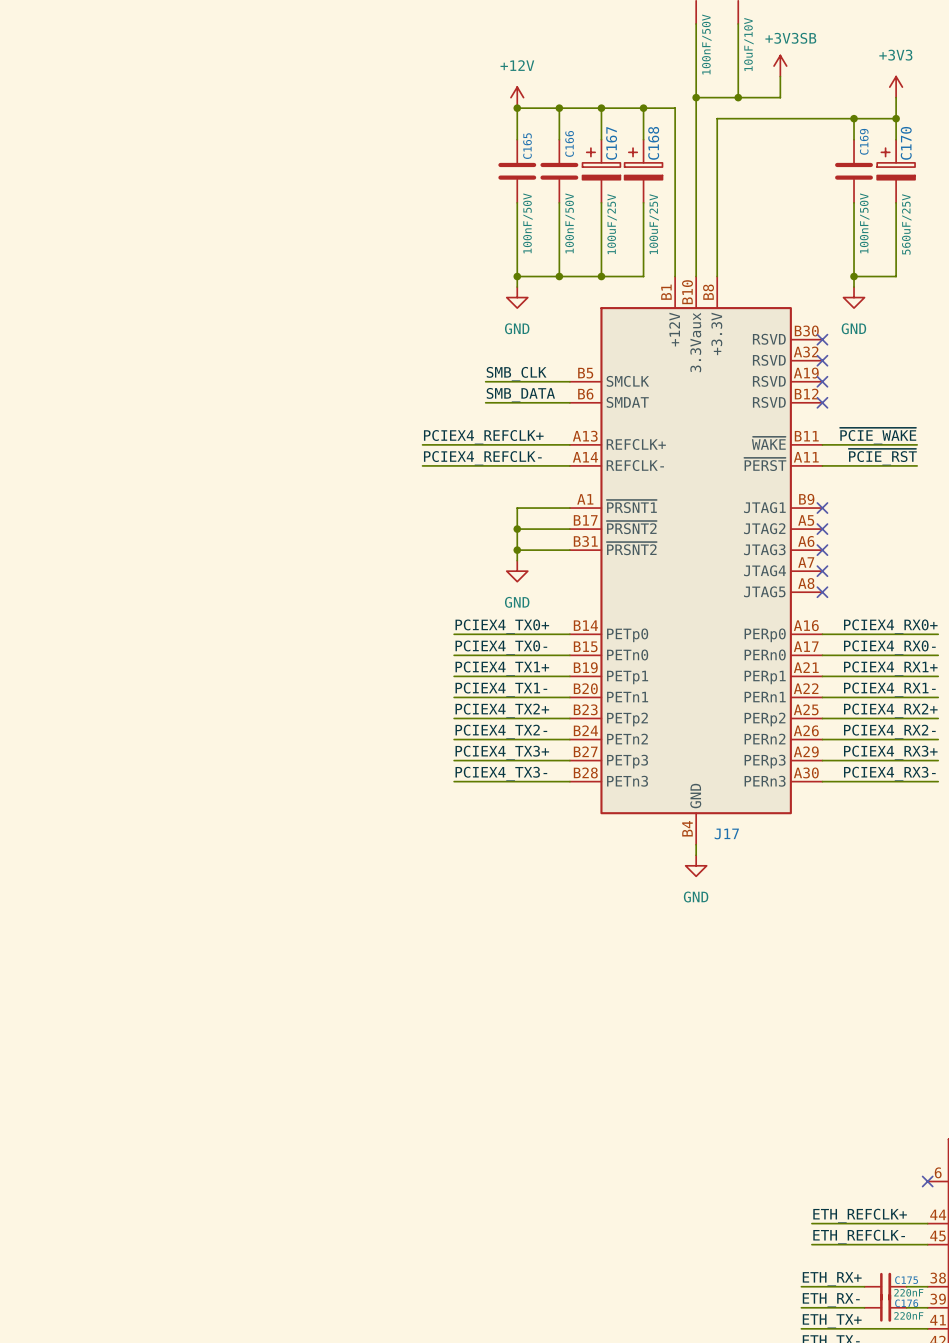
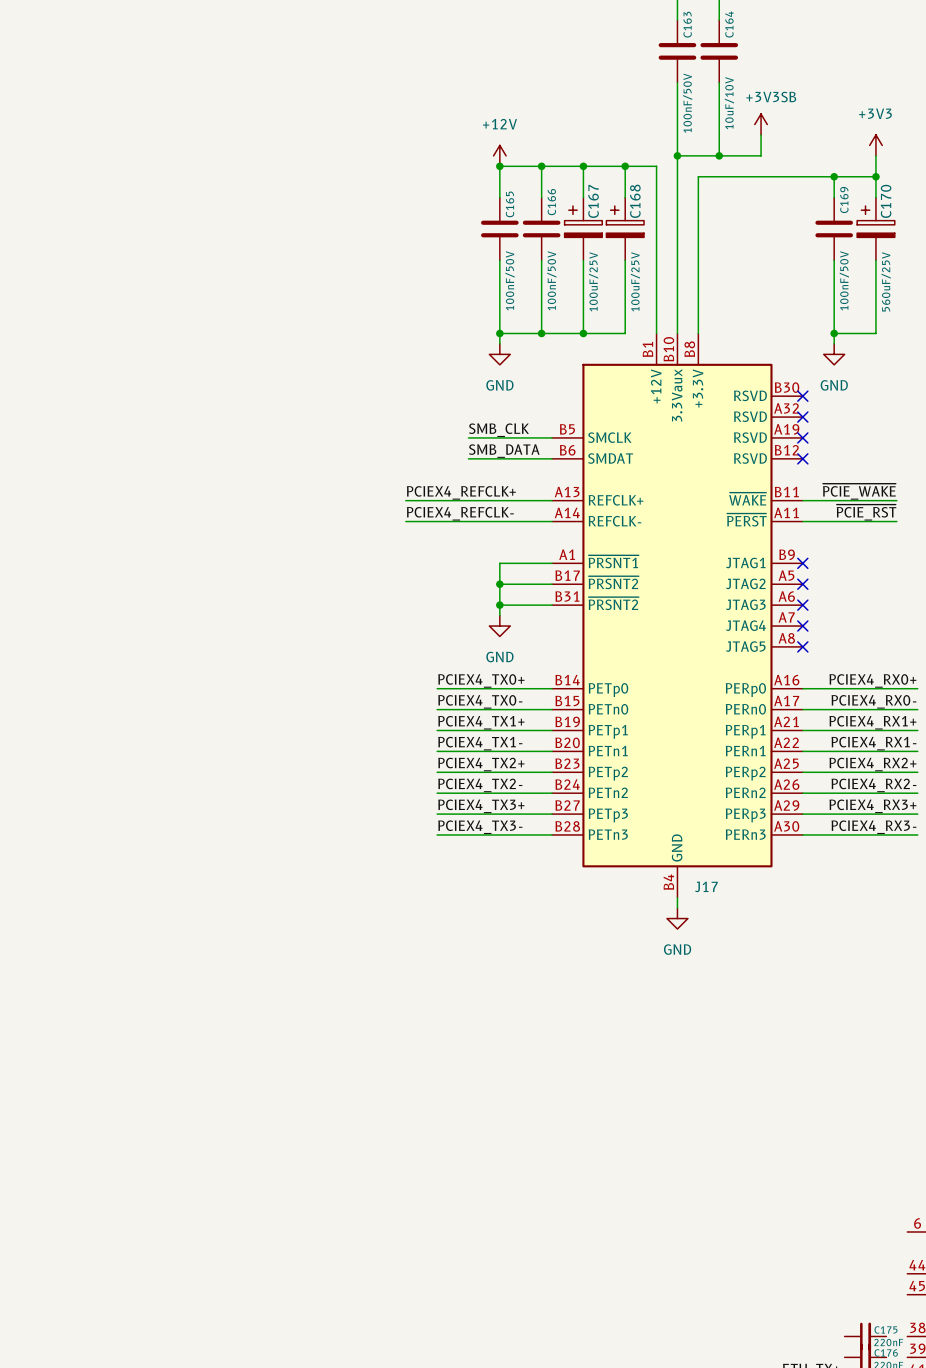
no-connect mark: (927, 1181) -> none
label: ETH_REFCLK+ (860, 1215) -> none
wire: (811, 1223) (927, 1223) -> none
label: ETH_REFCLK- (859, 1236) -> none
wire: (811, 1244) (927, 1244) -> none
label: ETH_RX+ (832, 1279) -> none
wire: (801, 1286) (864, 1286) -> none
wire: (906, 1286) (927, 1286) -> none
label: ETH_RX- (831, 1300) -> none
wire: (801, 1307) (864, 1307) -> none
wire: (906, 1307) (927, 1307) -> none

